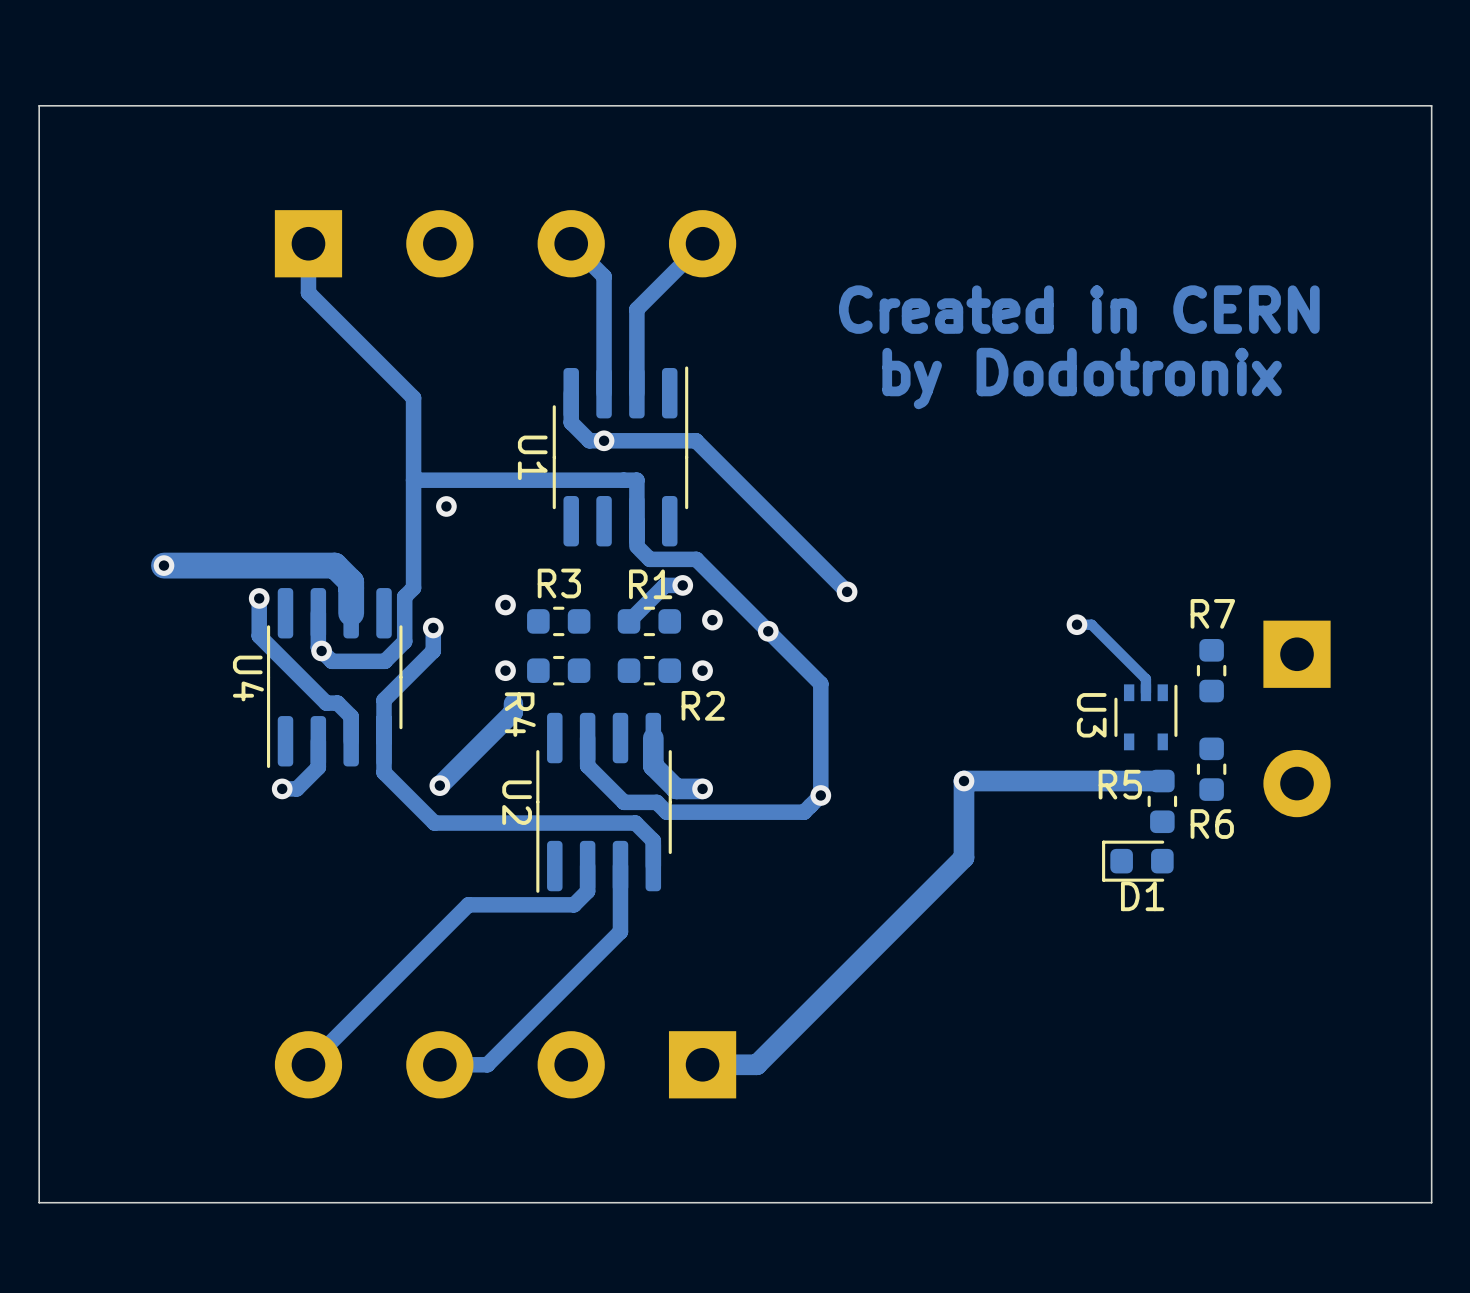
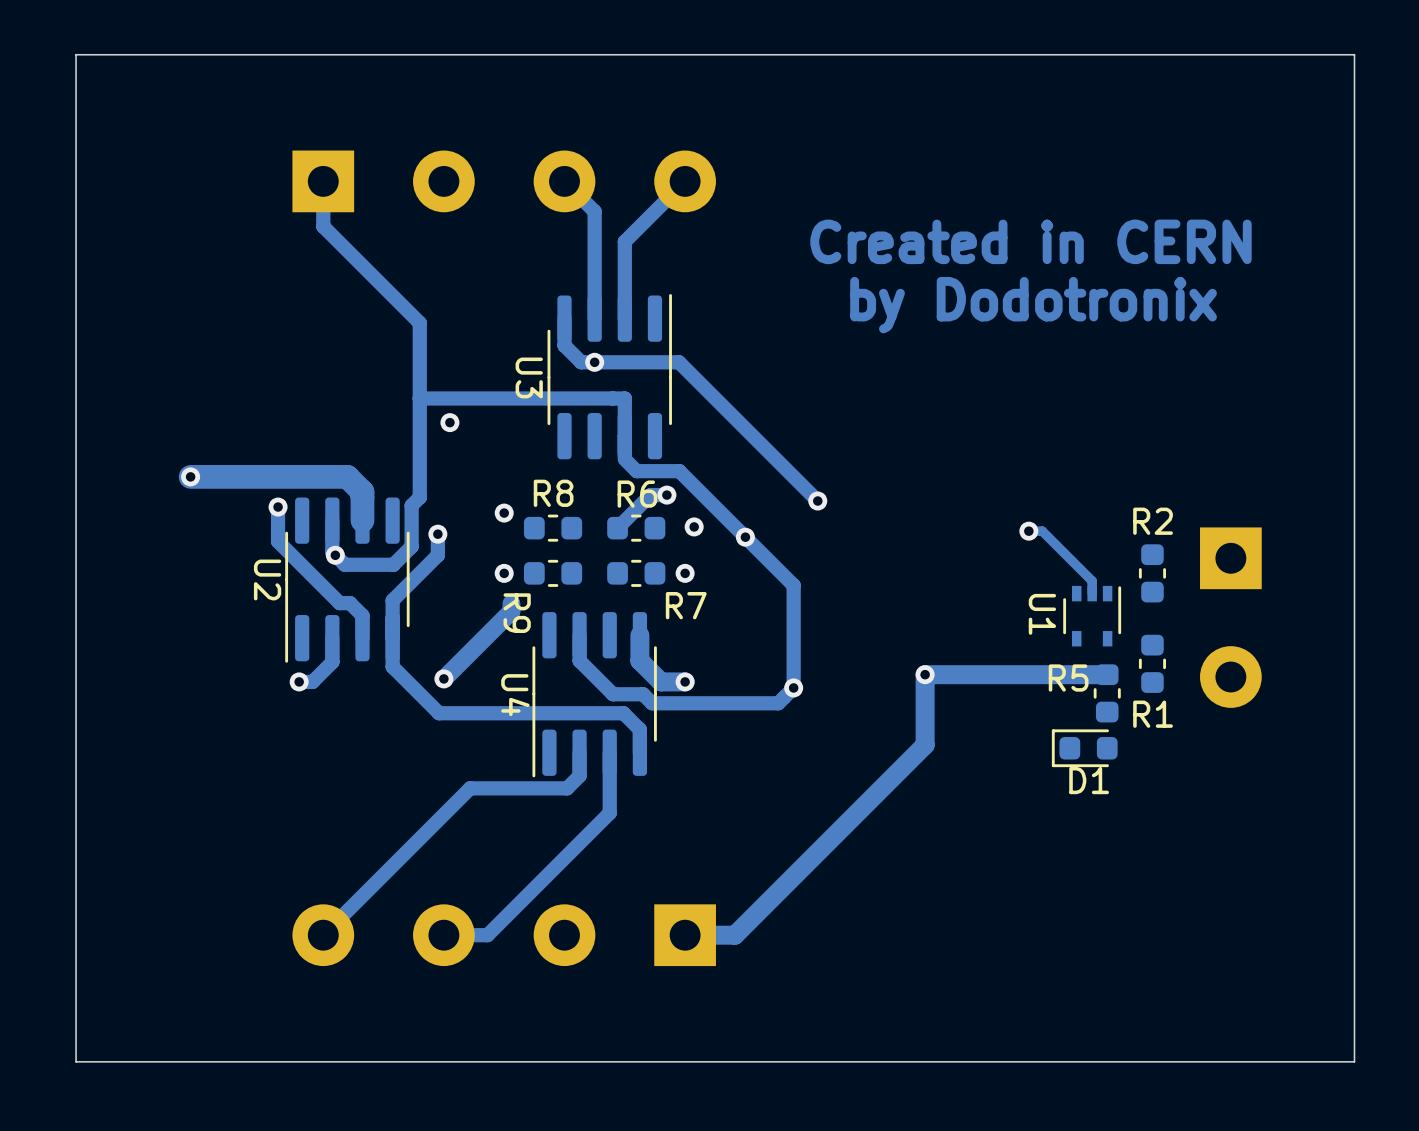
U1 name: U1 (532, 457) -> U3 (529, 377)
R3 name: R3 (559, 583) -> R8 (553, 493)
R1 name: R1 (650, 584) -> R6 (637, 494)
R7 name: R7 (1212, 613) -> R2 (1153, 521)
U4 name: U4 (248, 678) -> U2 (267, 579)
R2 name: R2 (703, 705) -> R7 (686, 605)
R4 name: R4 (520, 714) -> R9 (517, 613)
U3 name: U3 (1091, 715) -> U1 (1042, 614)
U2 name: U2 (517, 802) -> U4 (515, 695)
R6 name: R6 (1212, 824) -> R1 (1153, 714)

